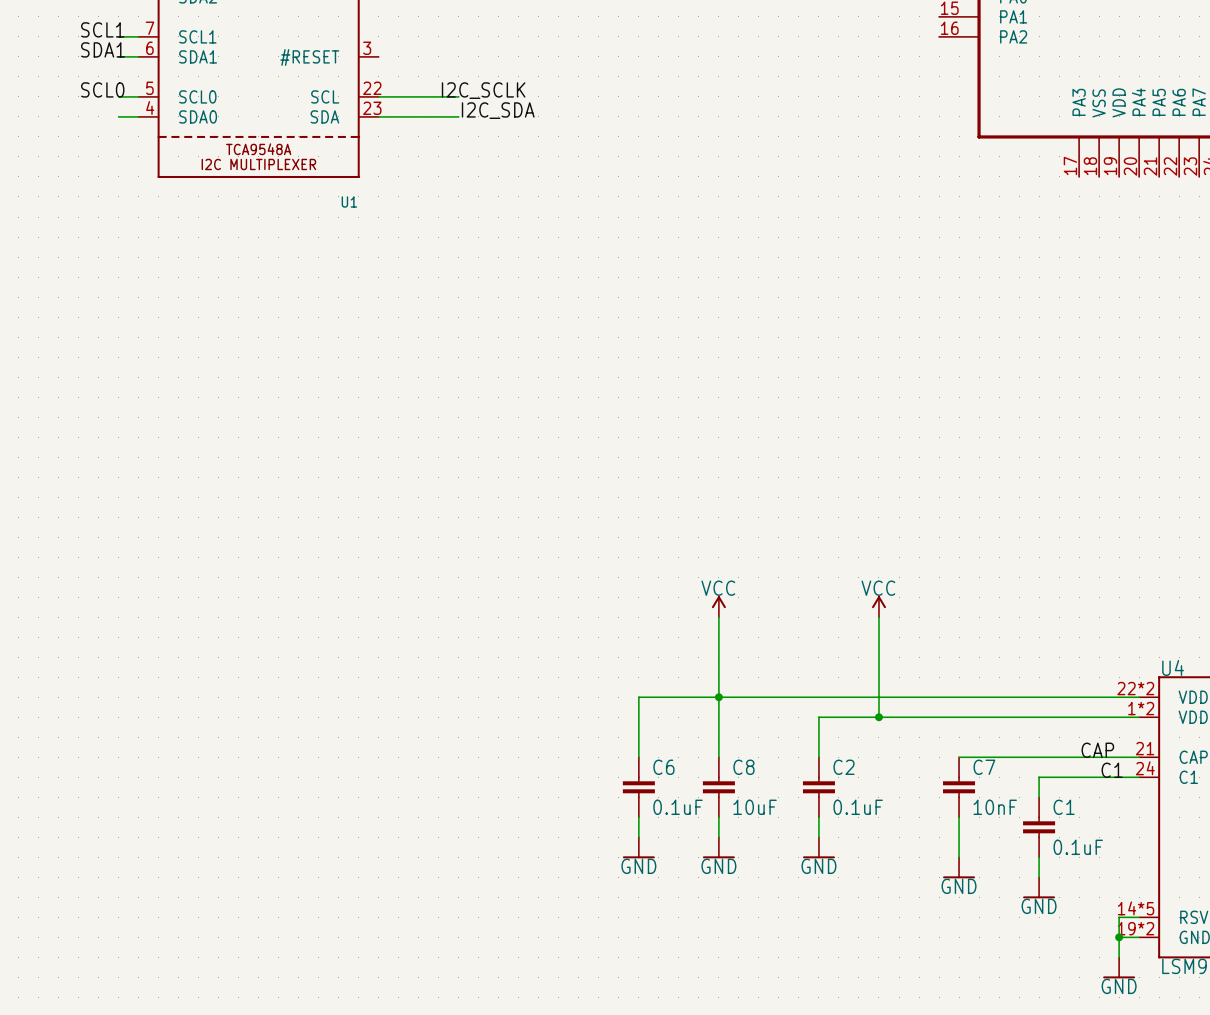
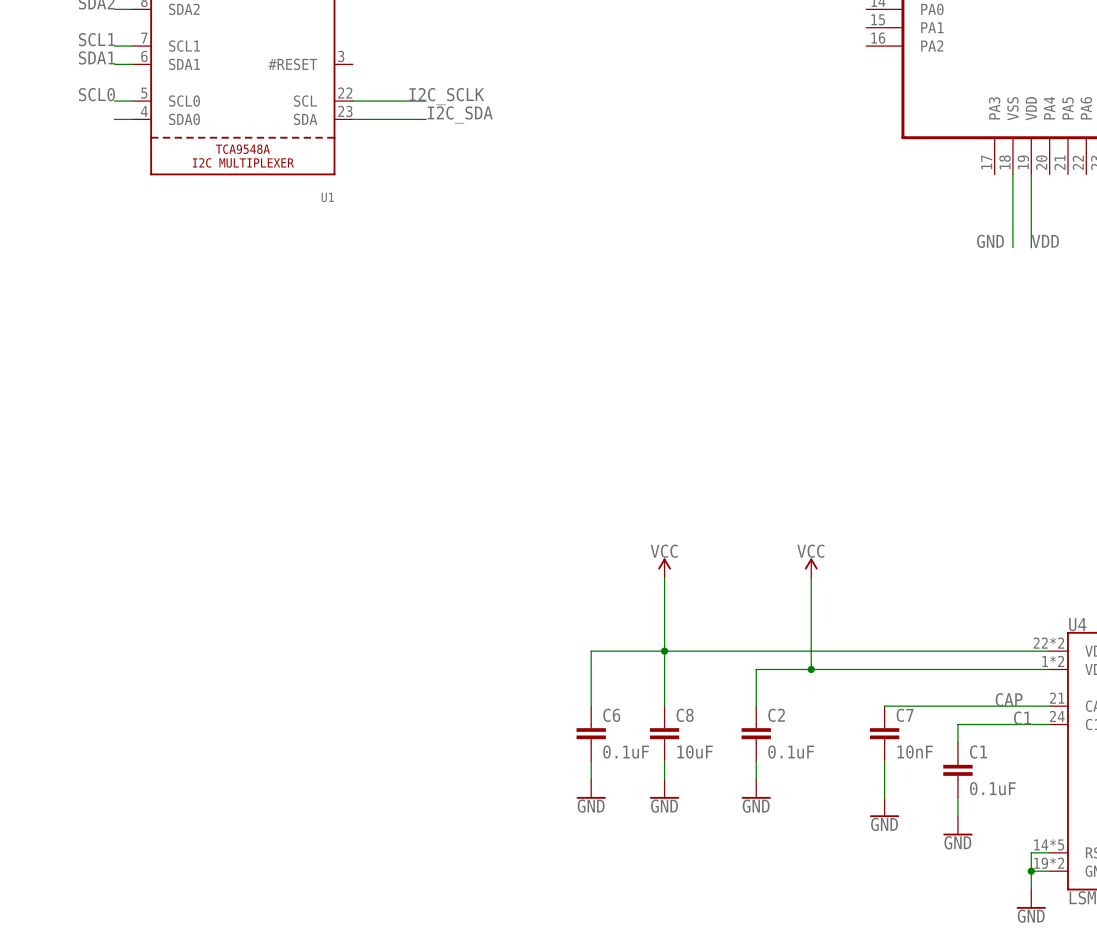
wire: none -> (1012, 174) (1012, 247)
wire: none -> (1031, 174) (1031, 247)
label: none -> GND (990, 241)
label: none -> VDD (1045, 241)

